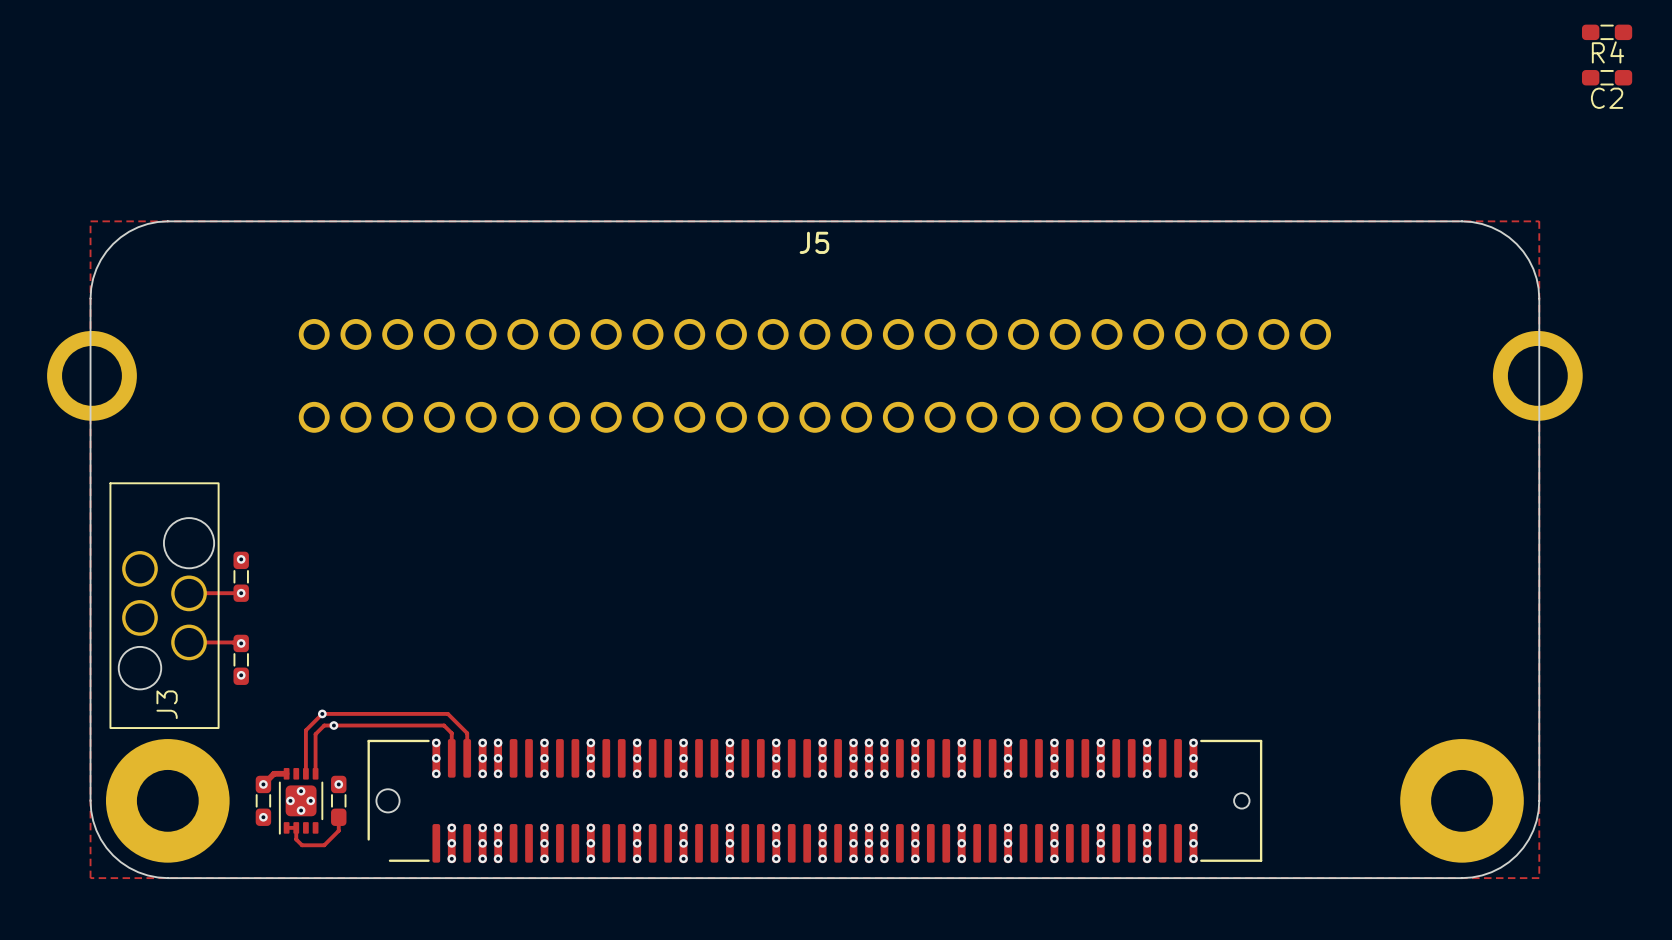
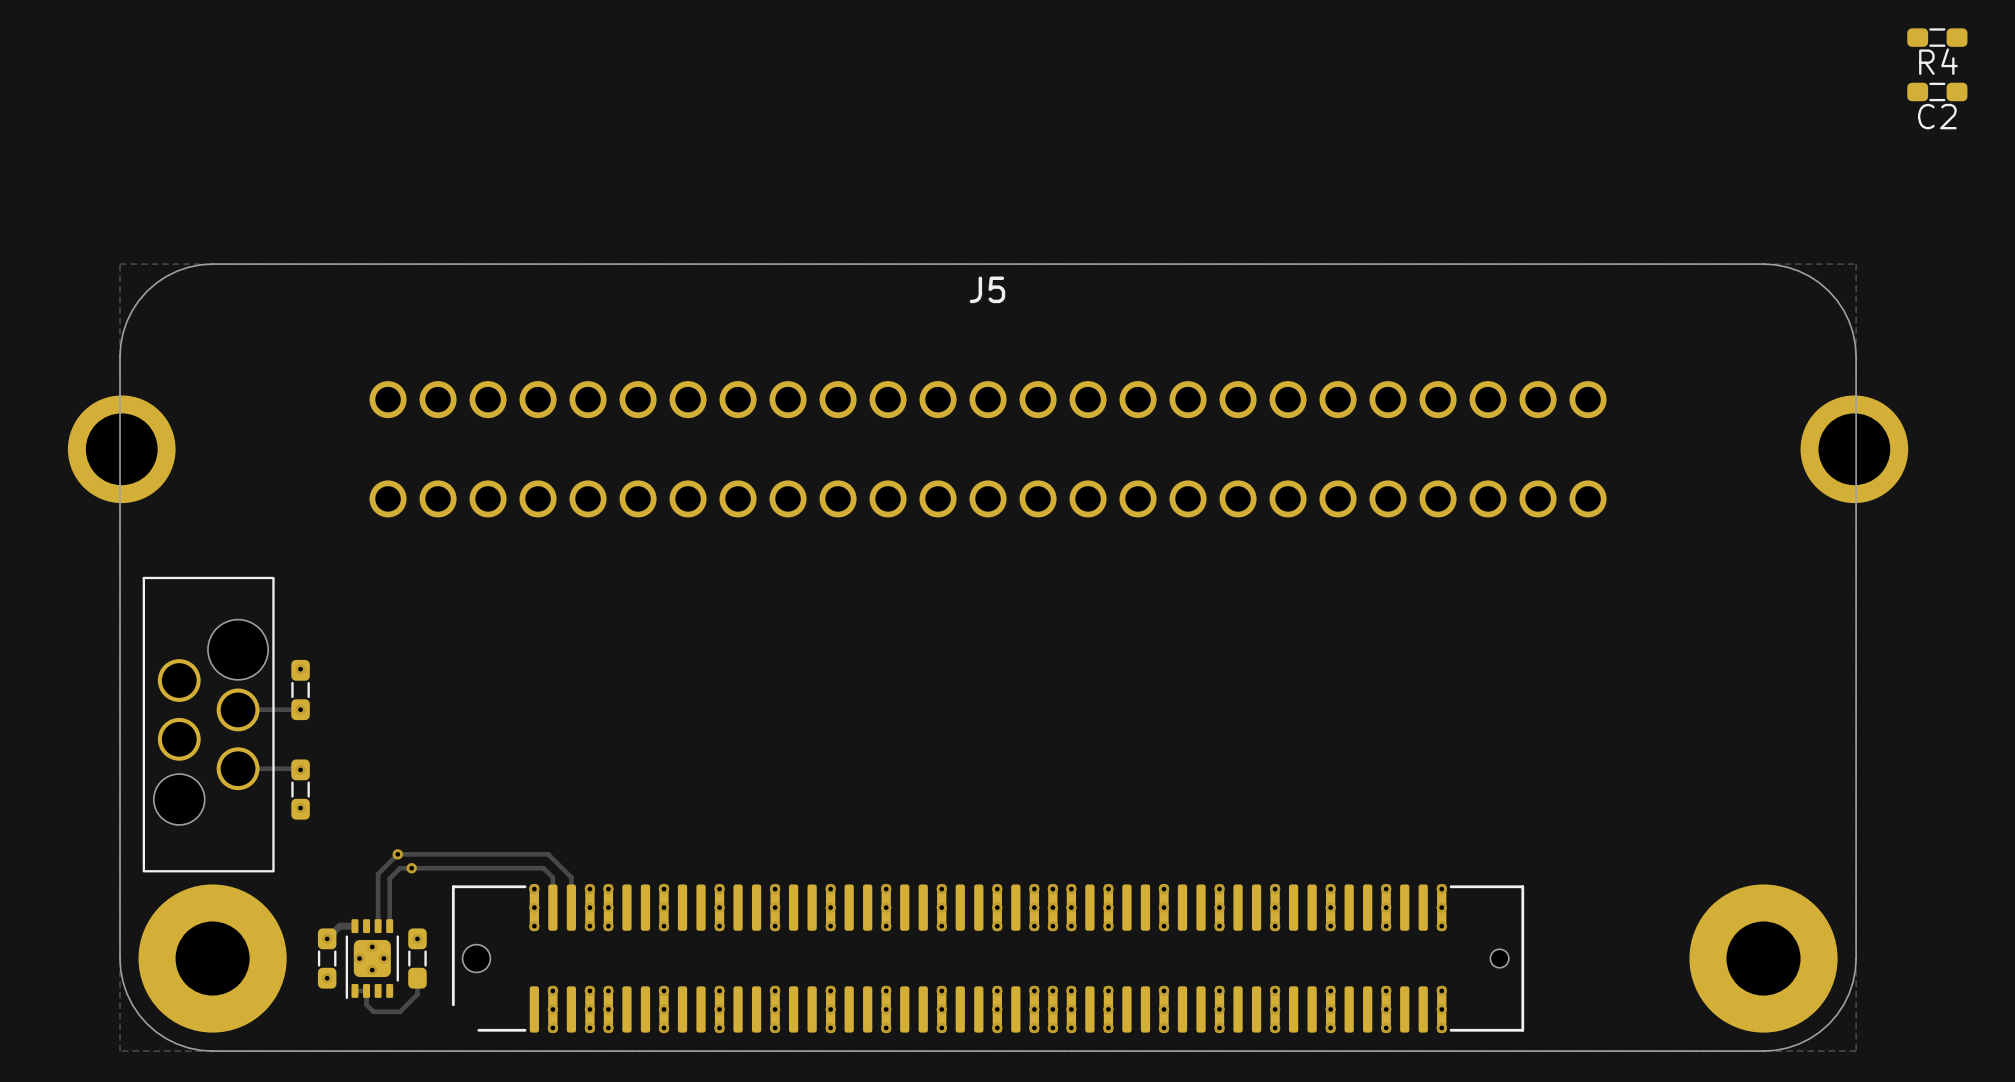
J3 name: J3 (167, 704) -> none

